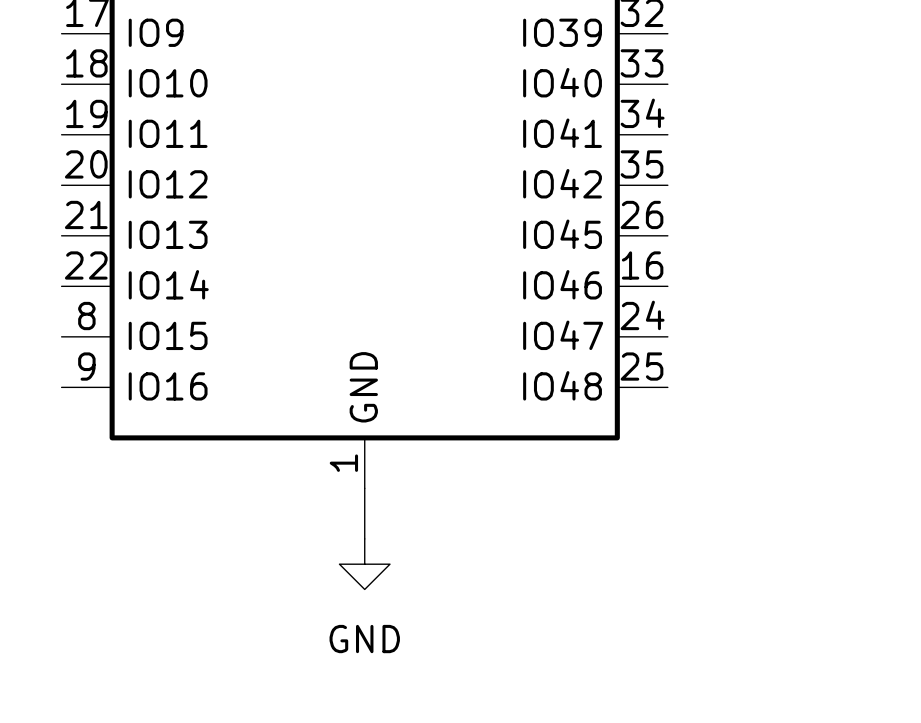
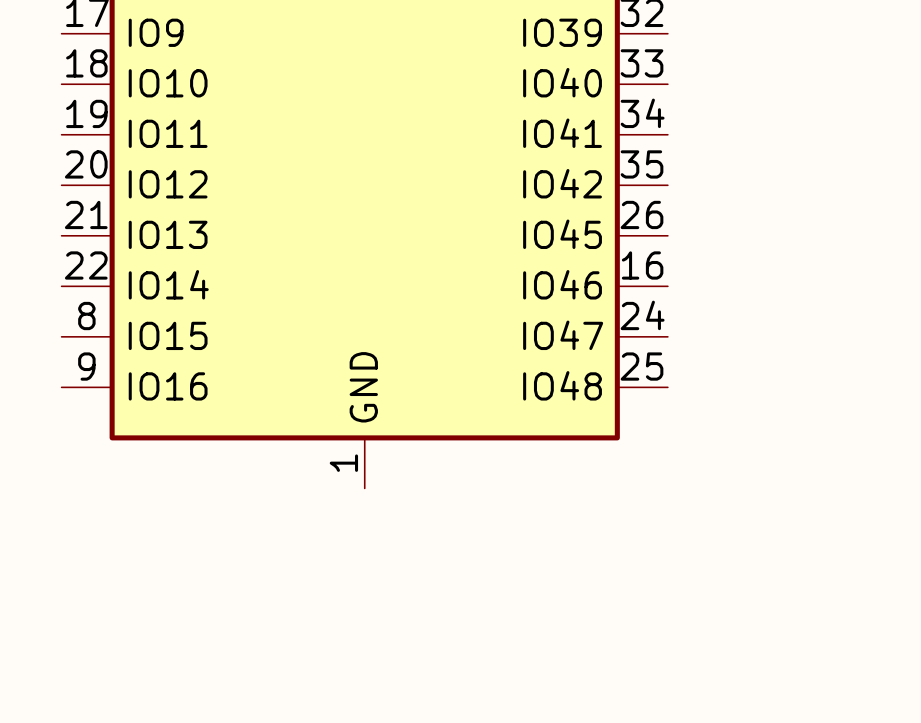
wire: (364, 488) (364, 538) -> none
power symbol: GND (364, 564) -> none

